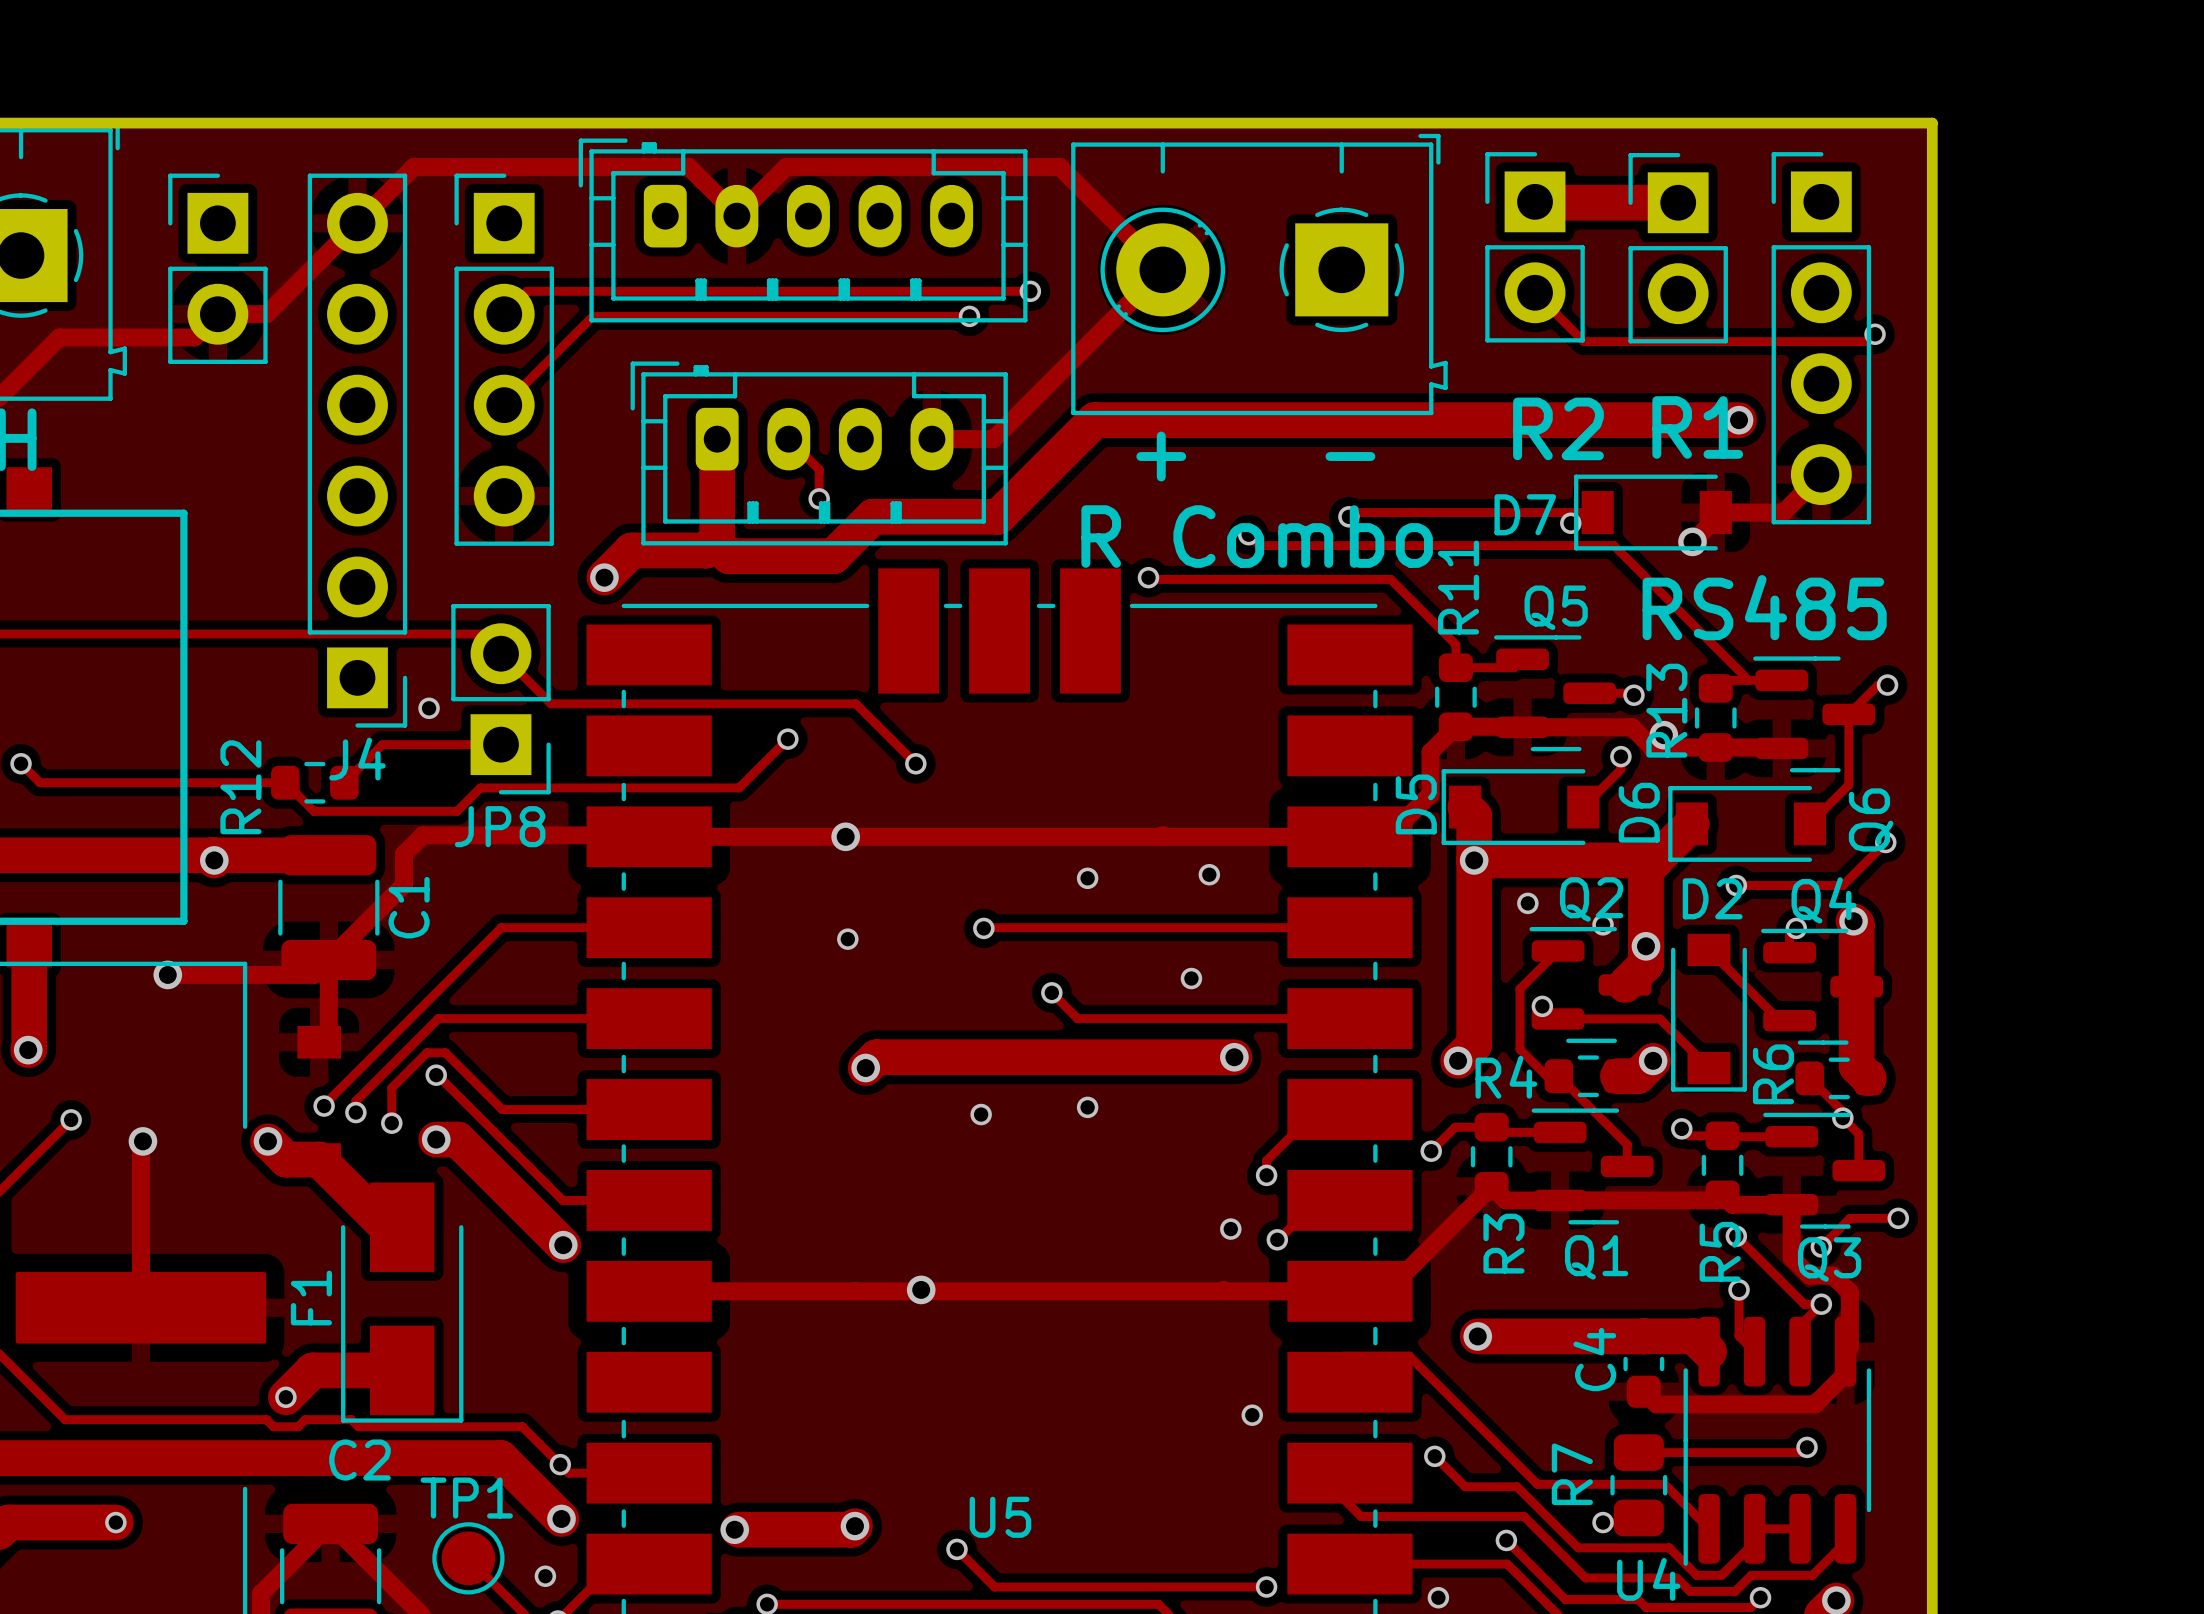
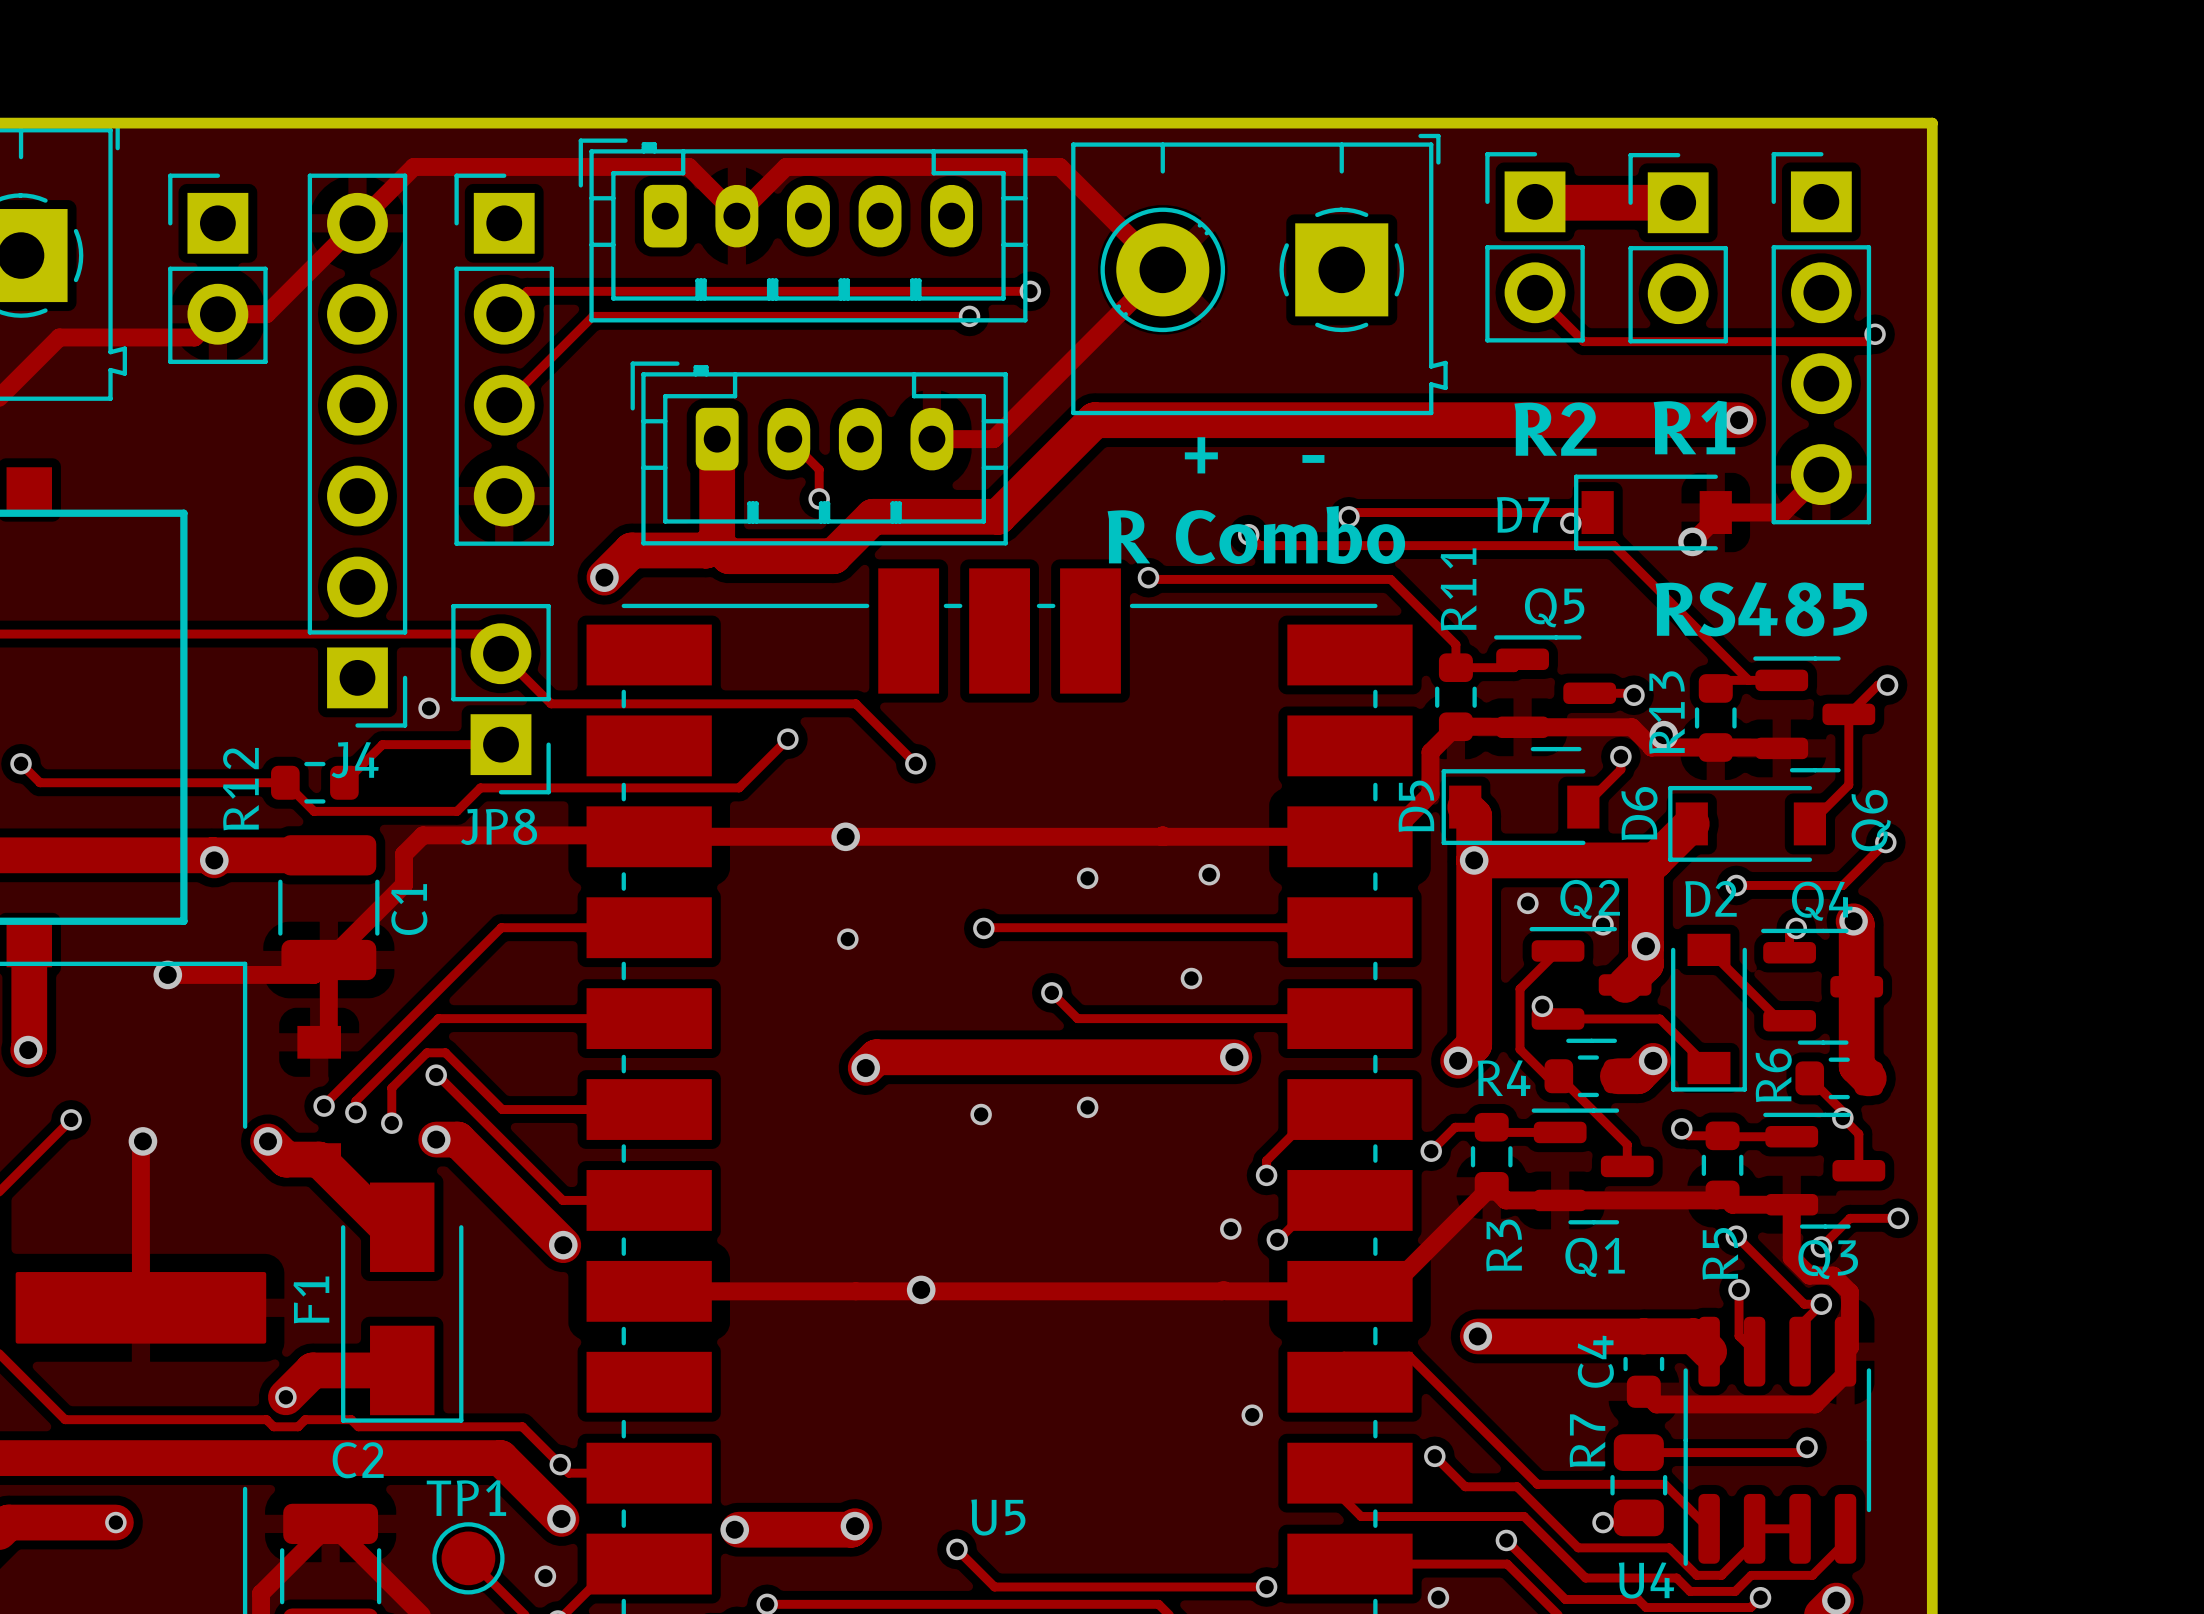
R7 name position: R7 (1572, 1474) -> R7 (1587, 1440)

